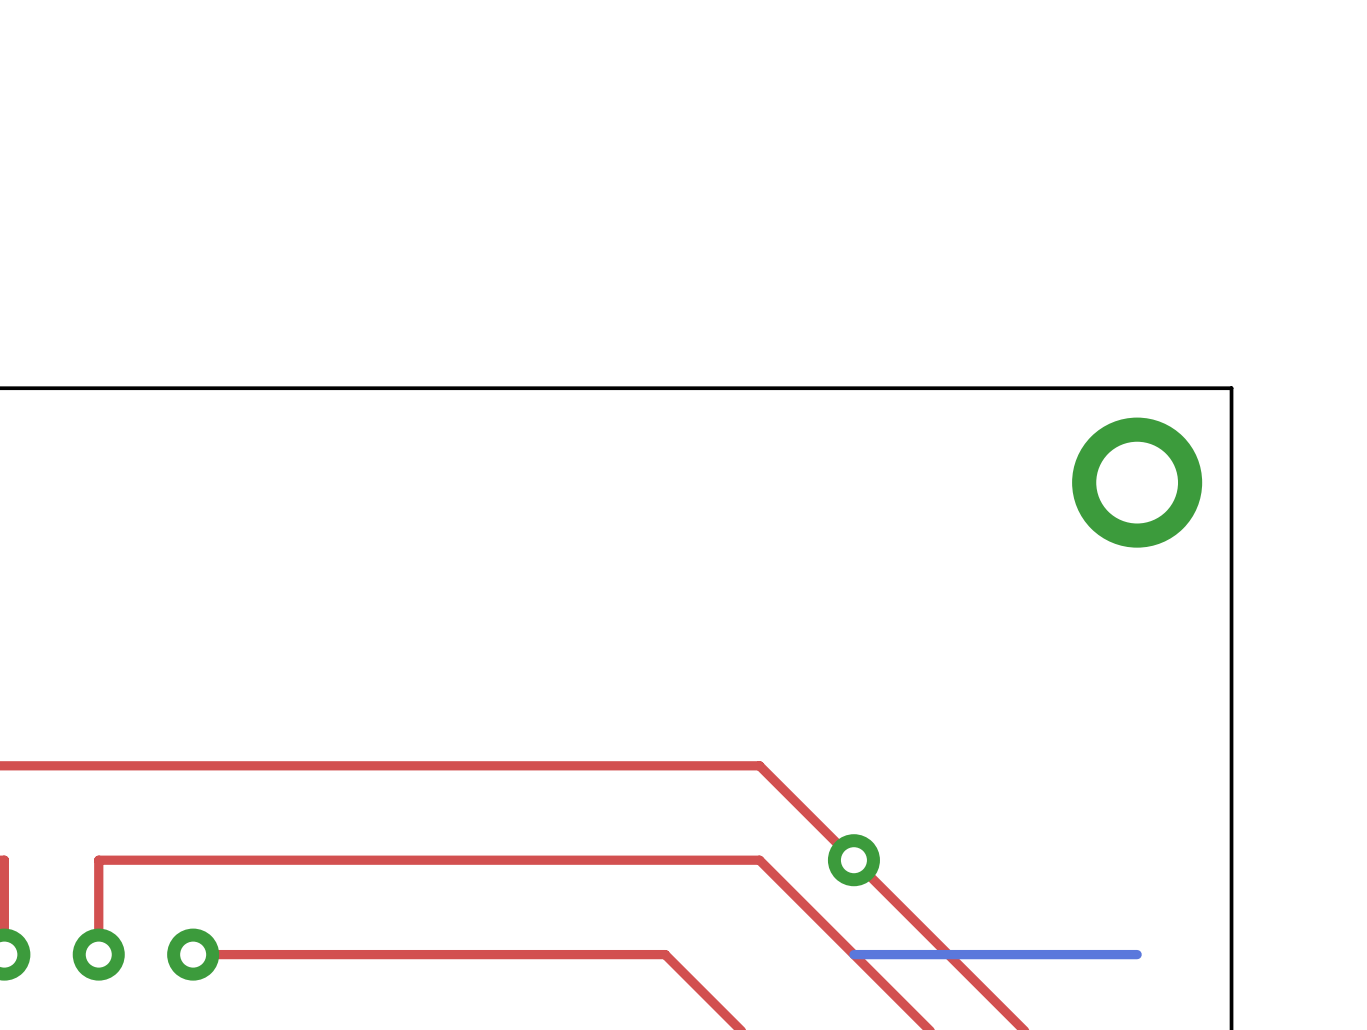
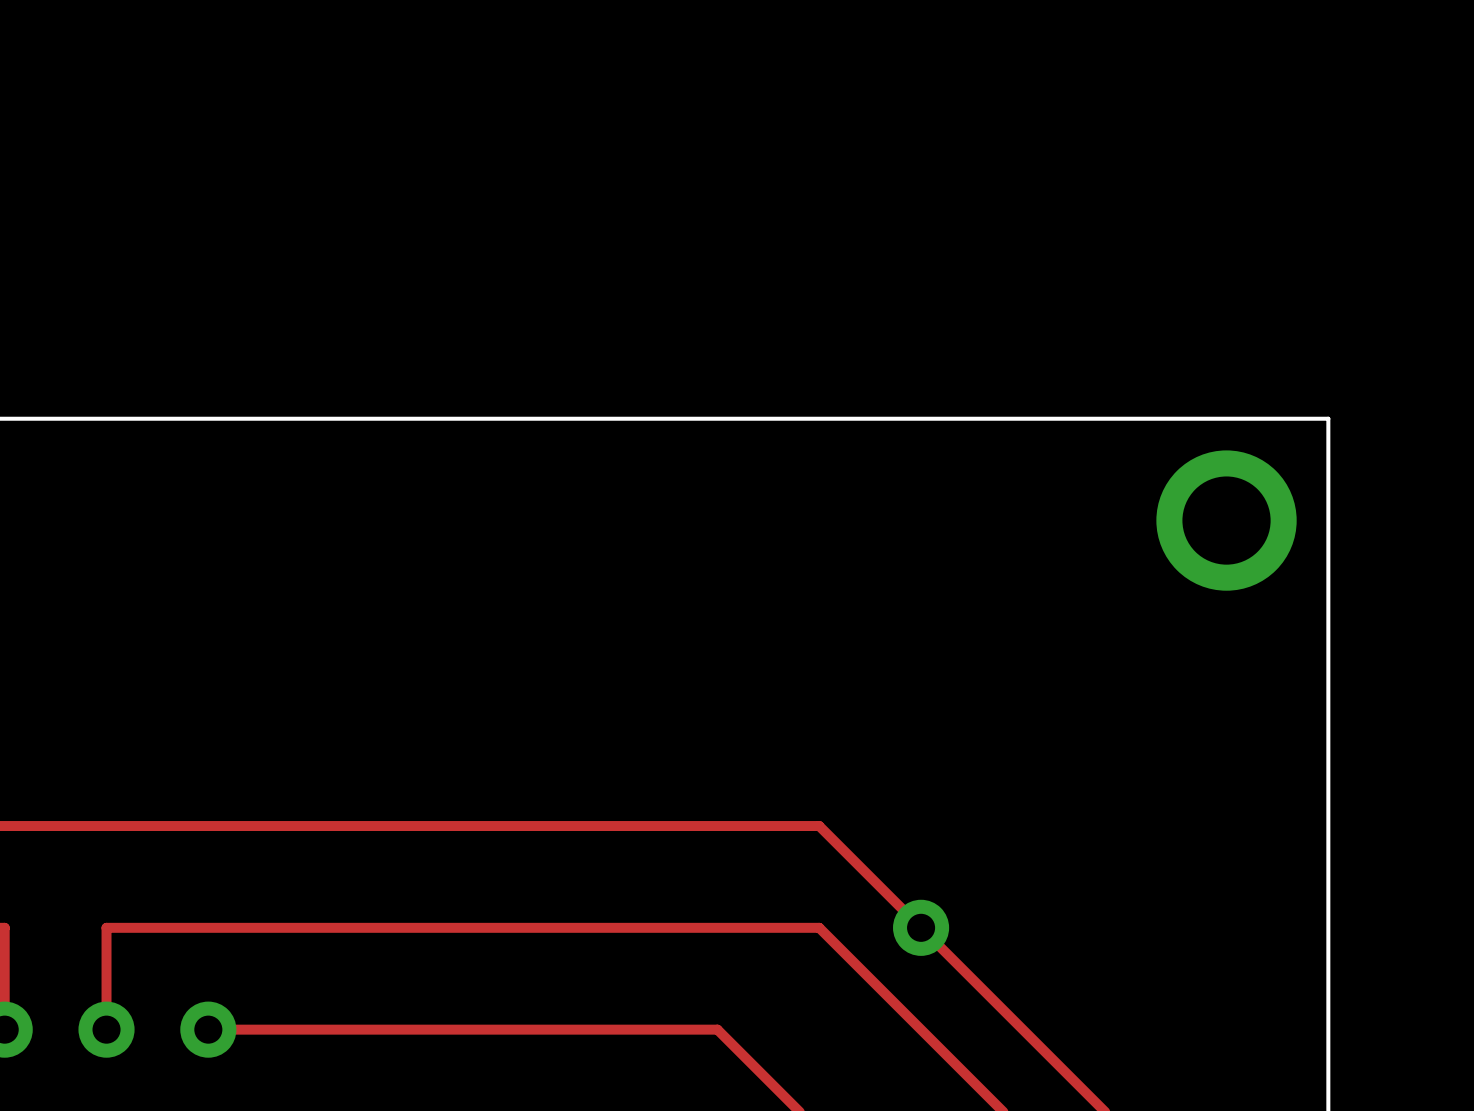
bottom track: (1137, 954) (853, 954) -> none

